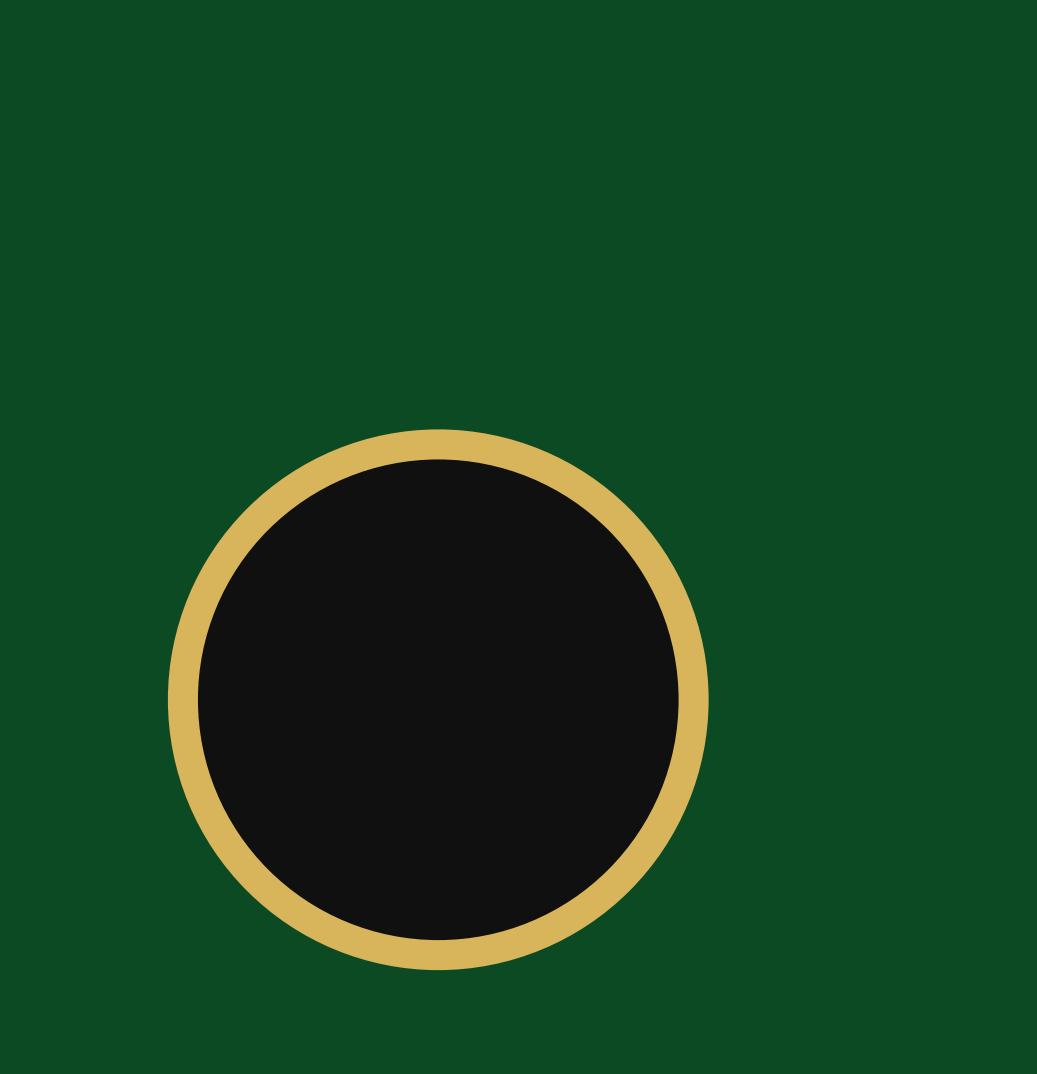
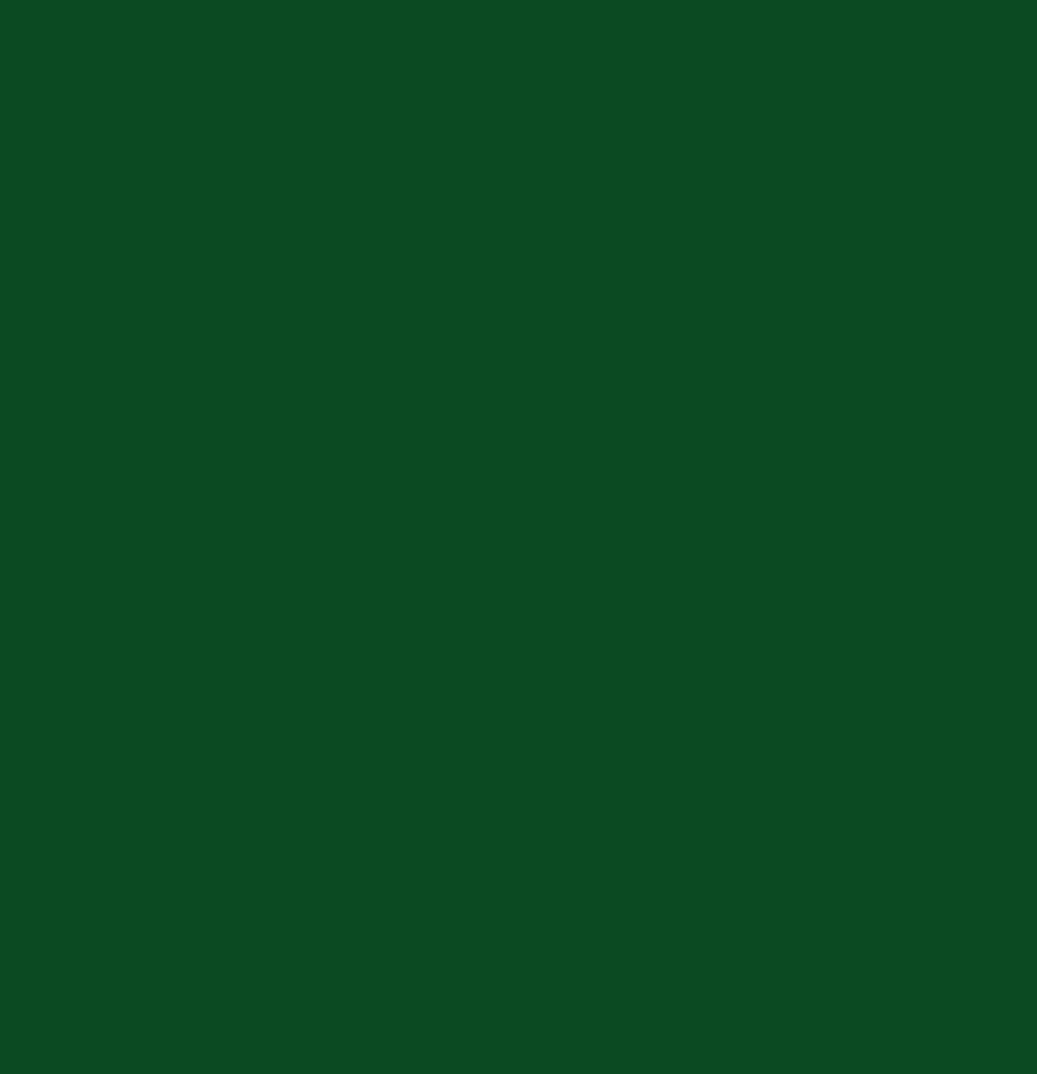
part: (438, 699) -> none

